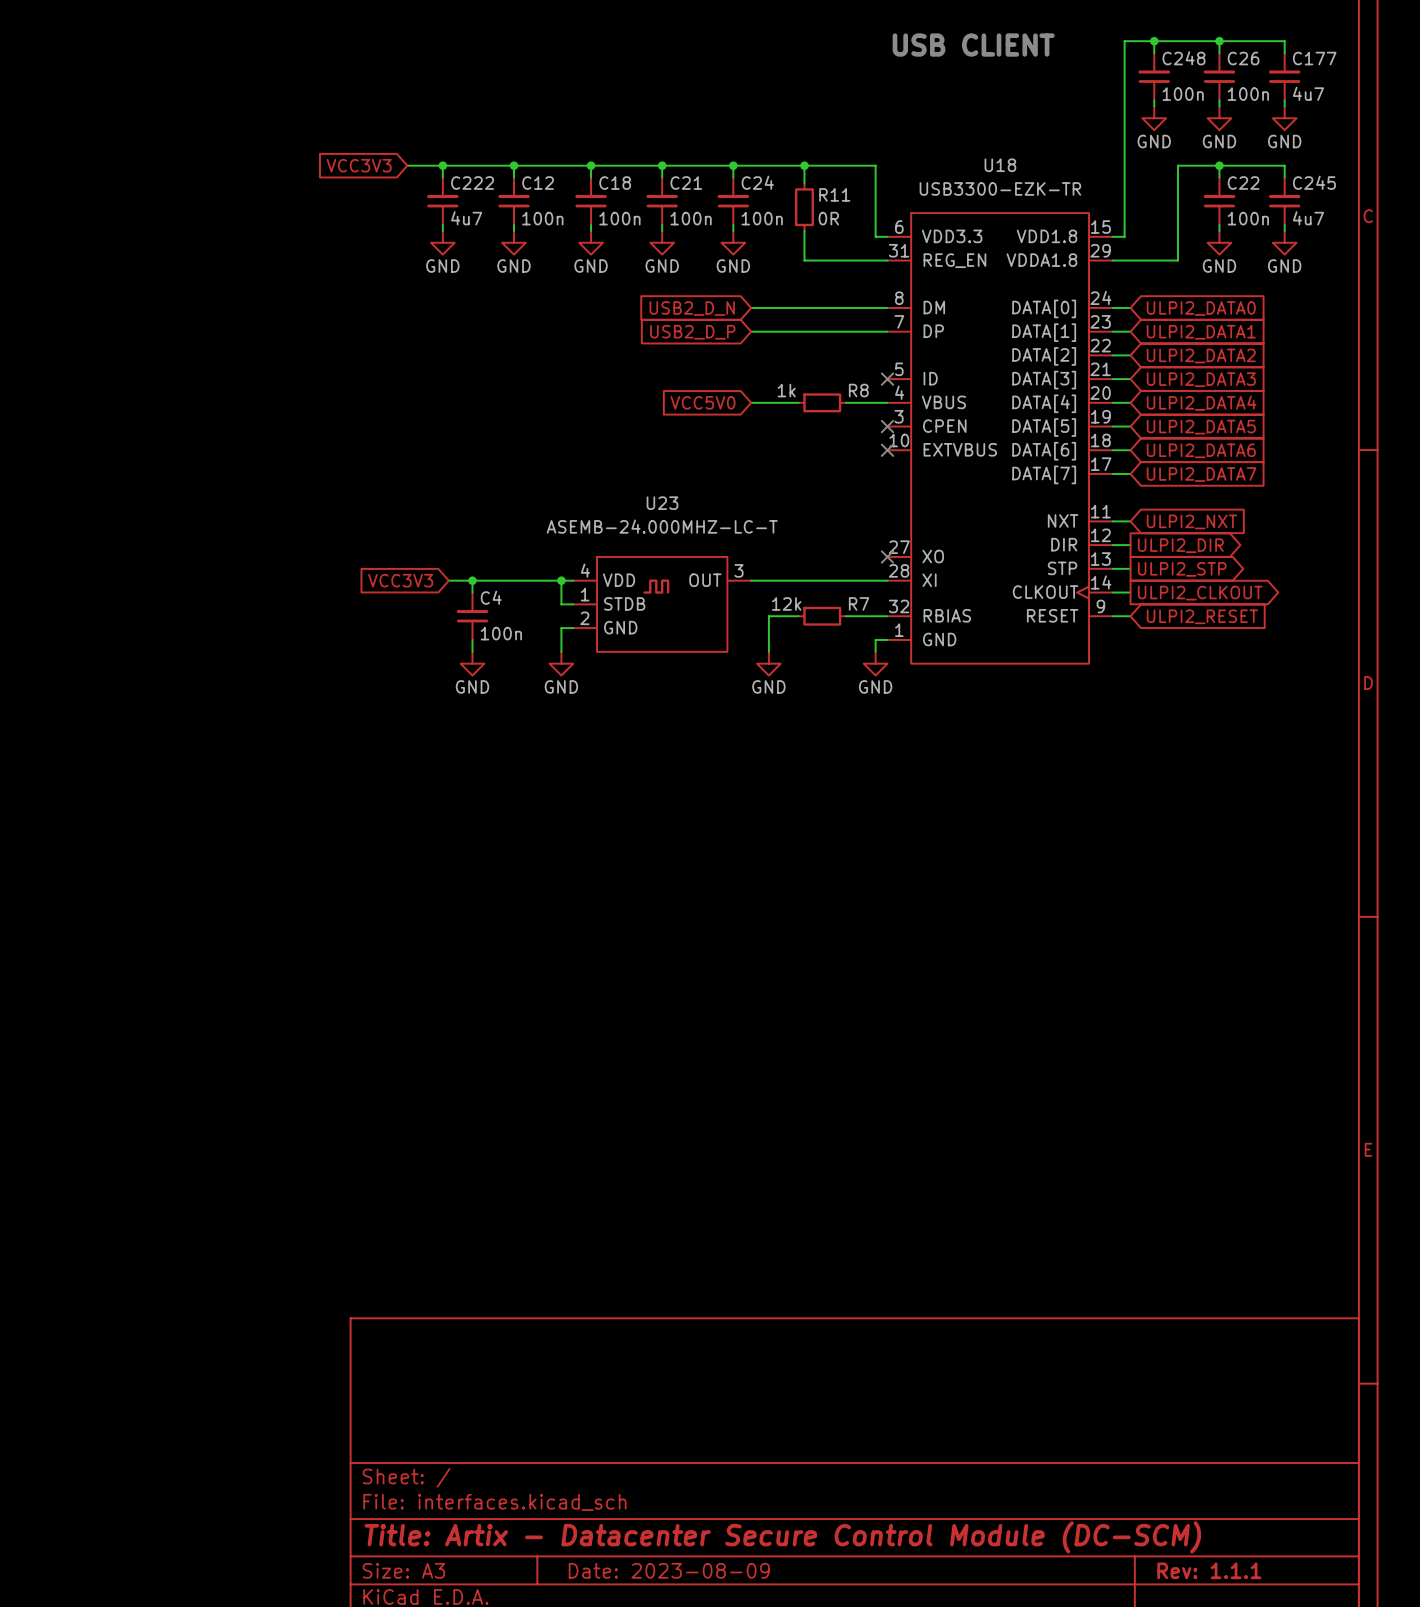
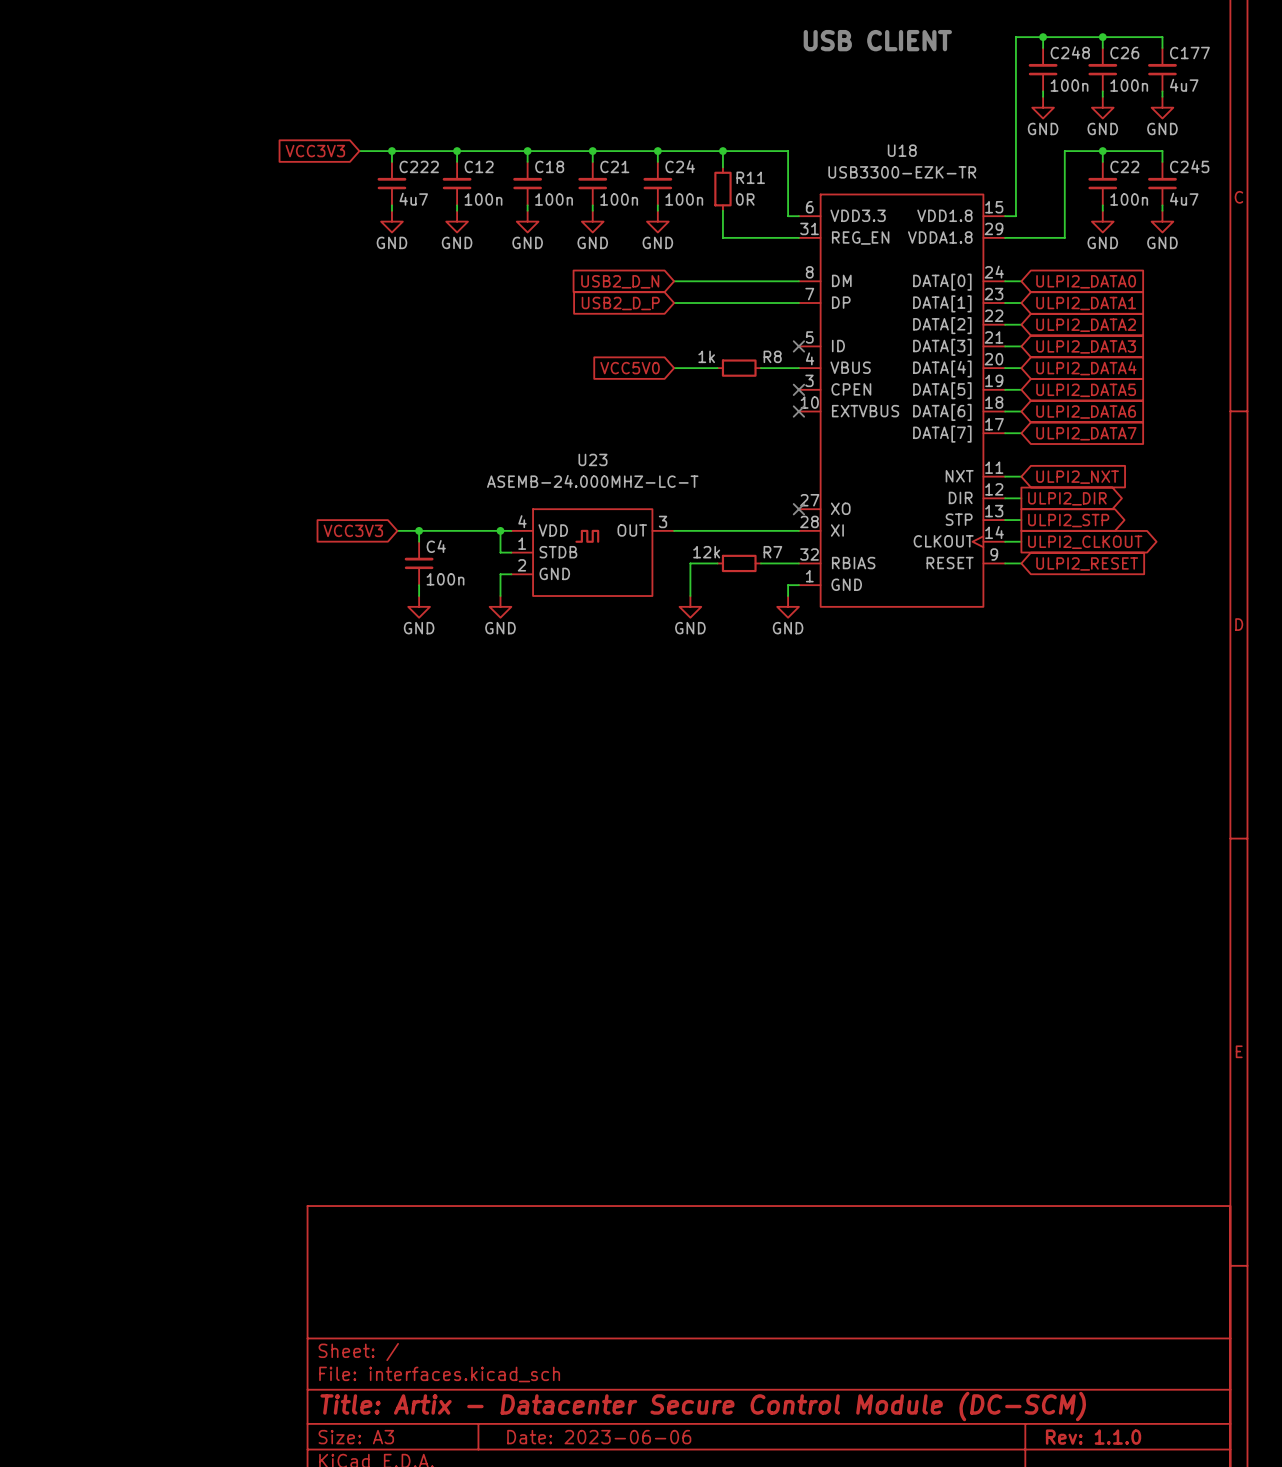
title block: Date: 2023-08-09 (669, 1570) -> Date: 2023-06-06 (599, 1437)
title block: Rev: 1.1.1 (1209, 1570) -> Rev: 1.1.0 (1093, 1437)

